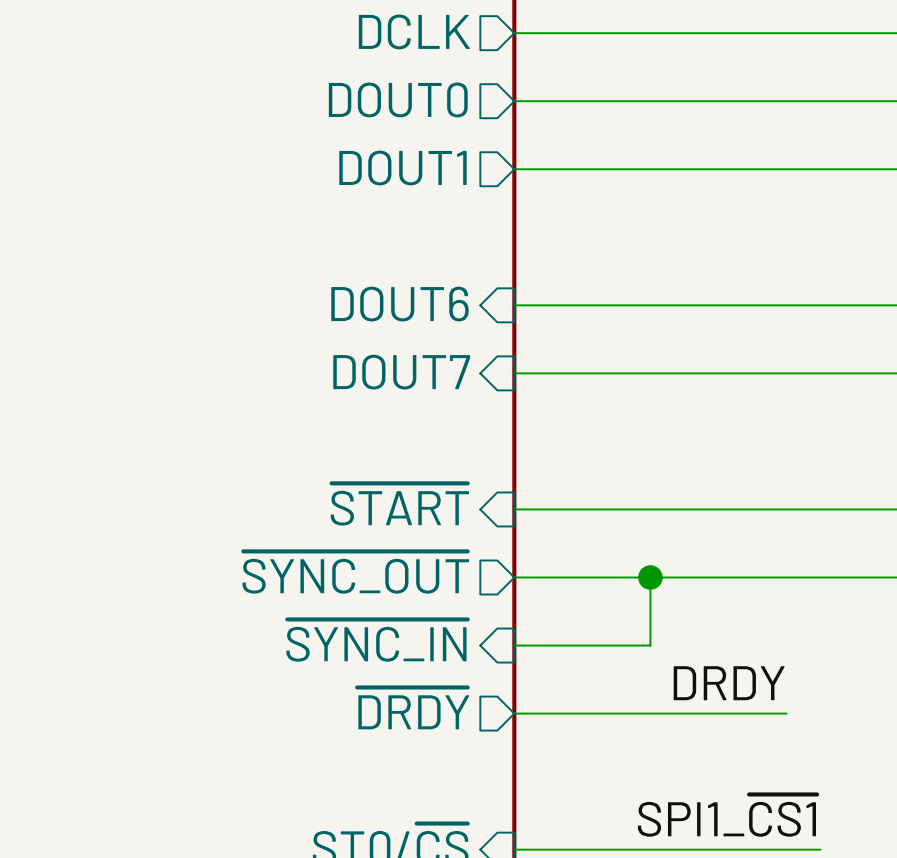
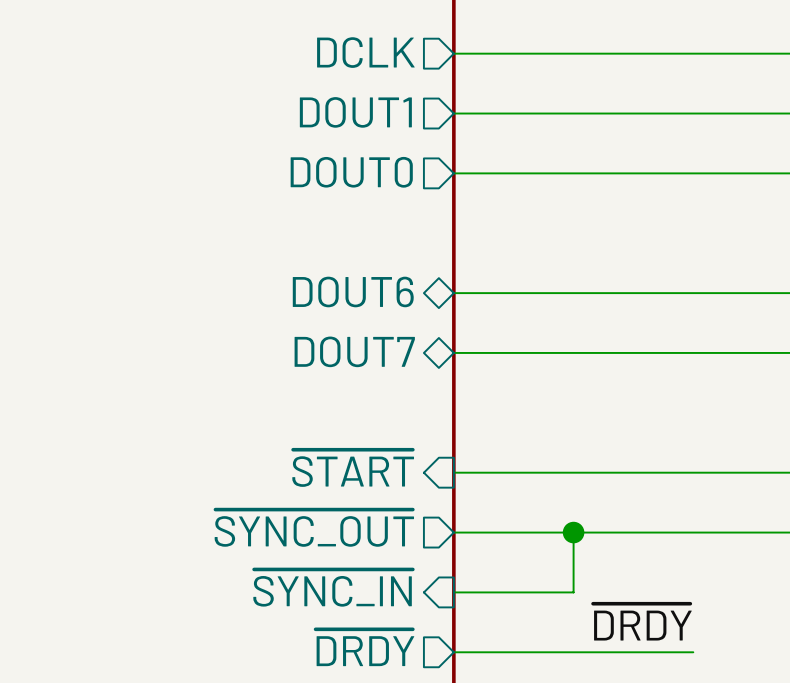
sheet pin: DOUT0 (398, 99) -> DOUT1 (355, 112)
sheet pin: DOUT1 (402, 167) -> DOUT0 (351, 172)
sheet pin shape: input (399, 304) -> bidirectional (353, 291)
sheet pin shape: input (401, 372) -> bidirectional (354, 351)
label: DRDY (729, 683) -> ~{DRDY} (642, 622)

